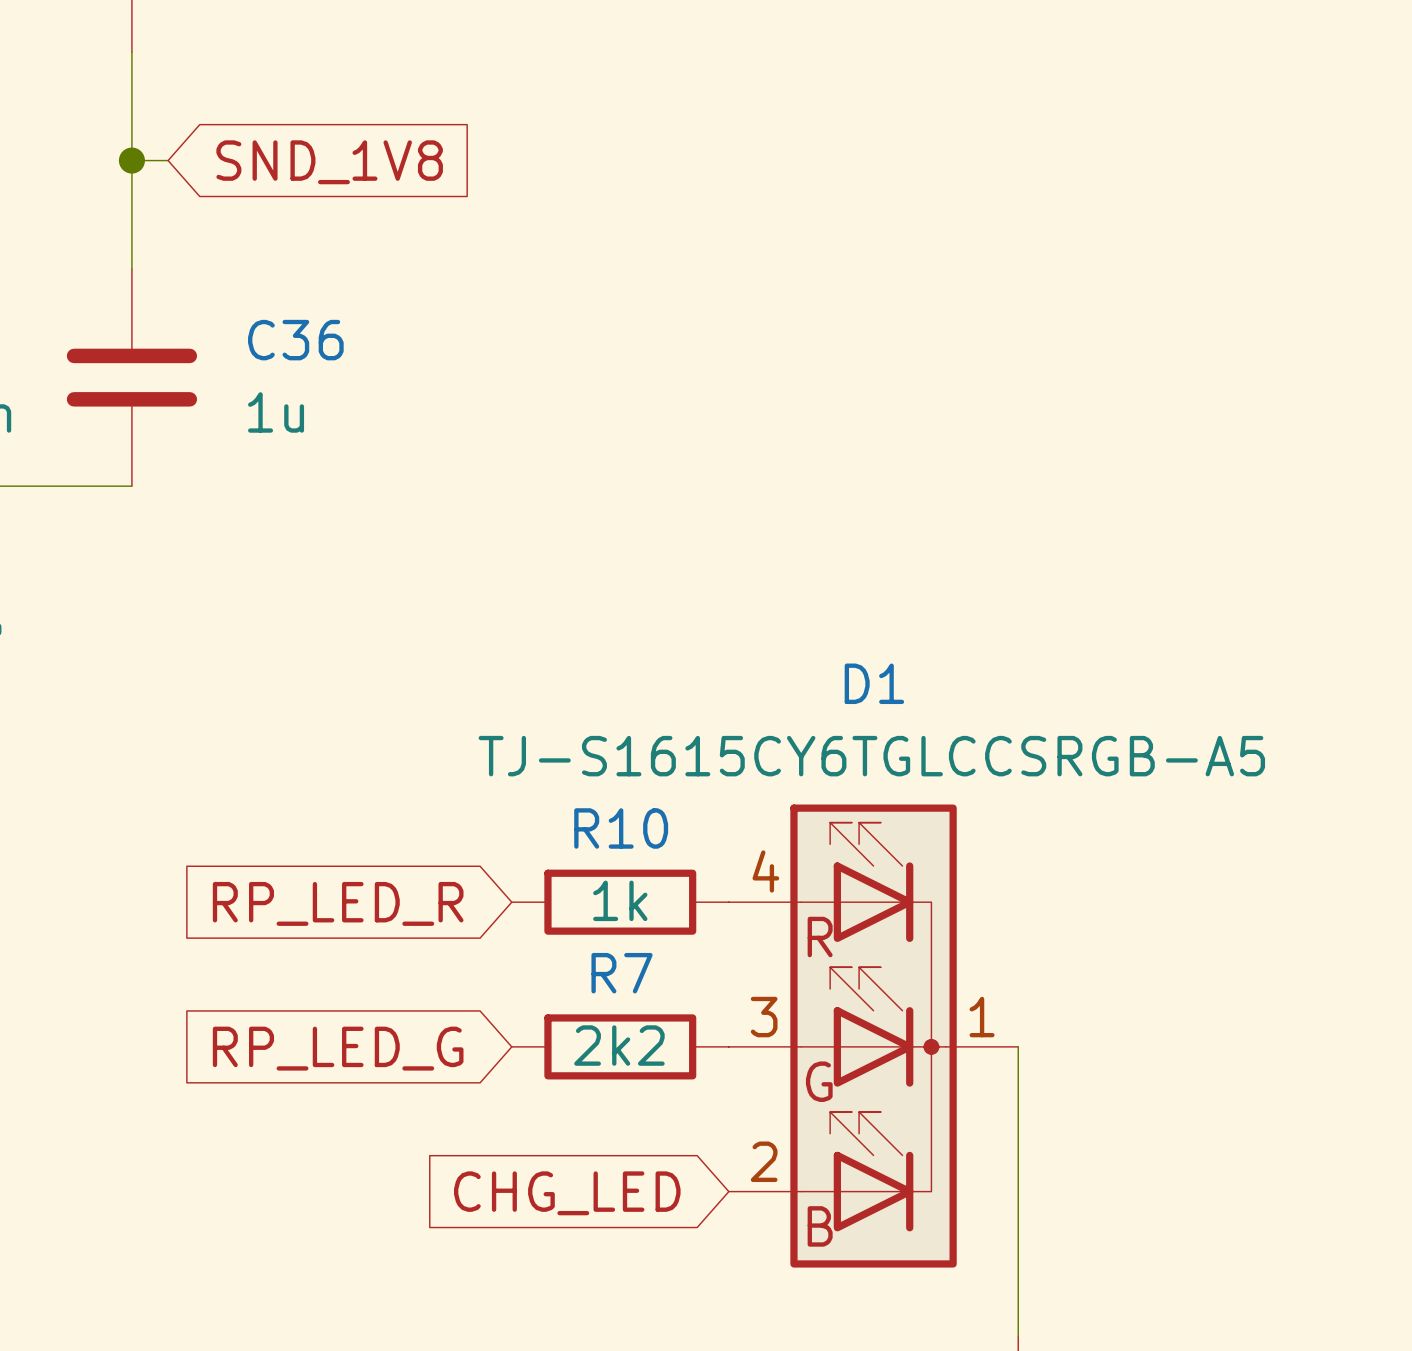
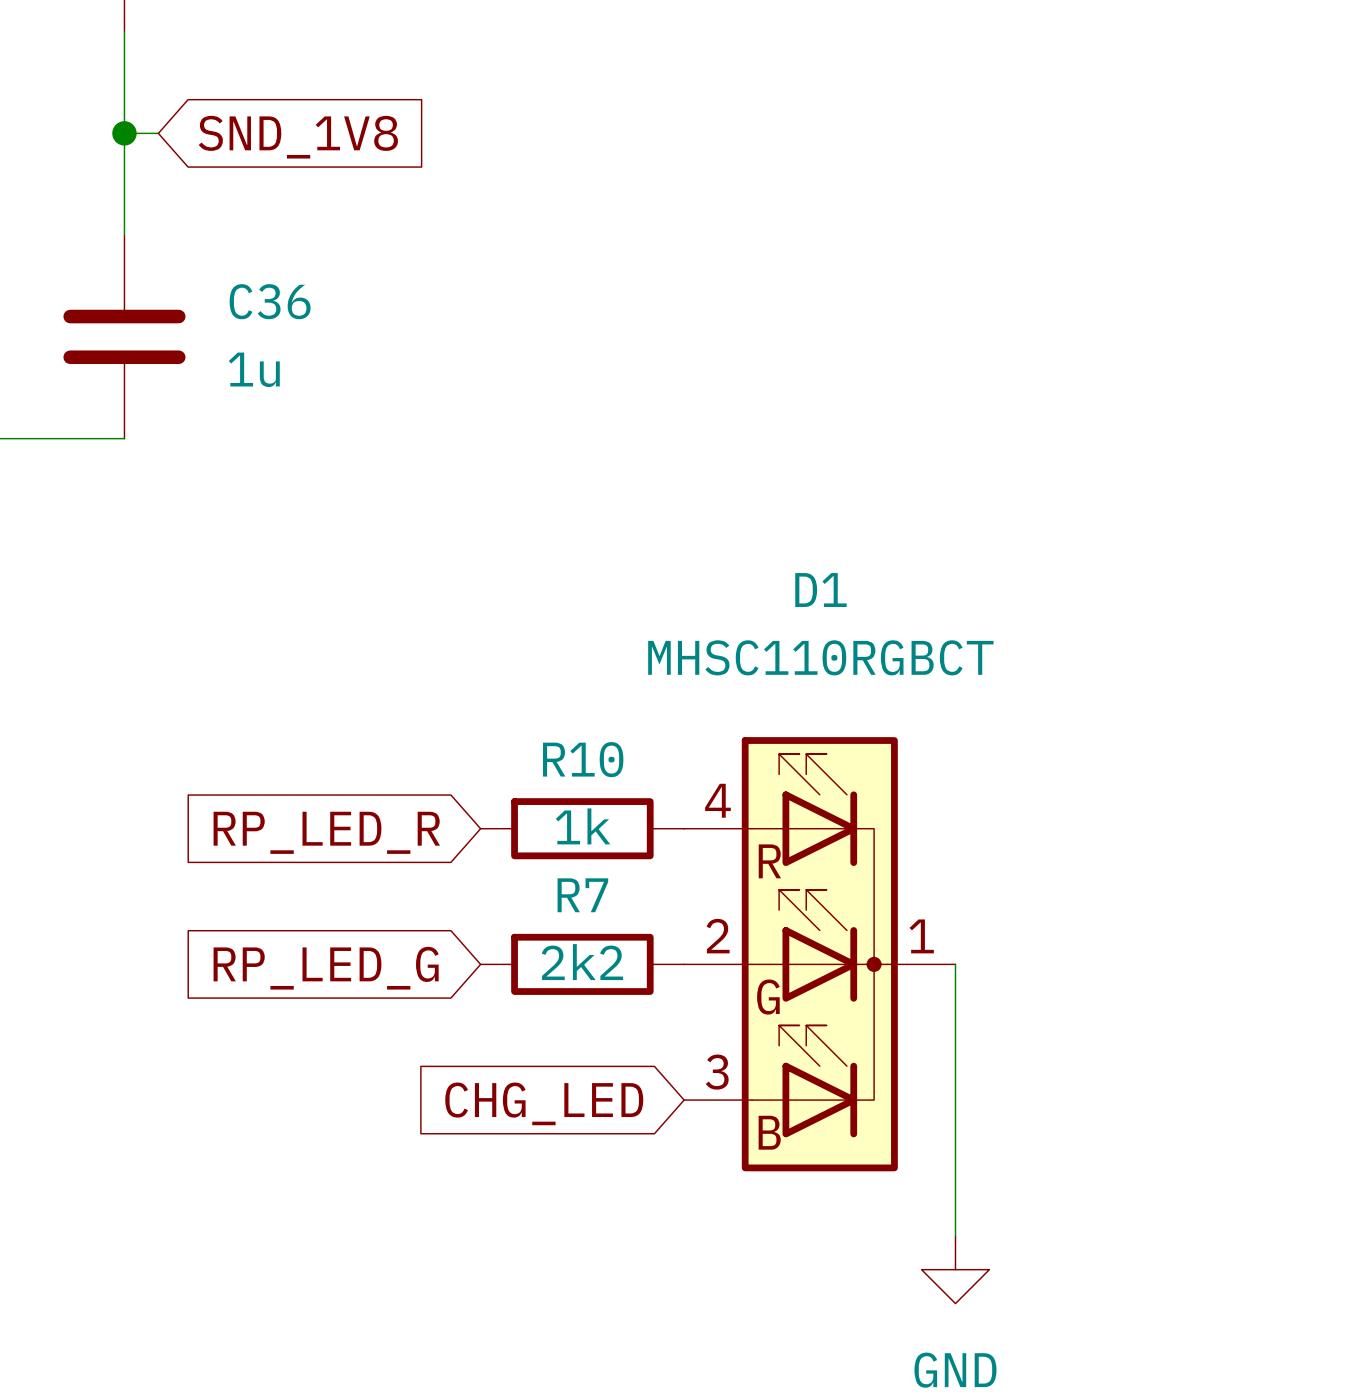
D1 name position: D1 (874, 683) -> D1 (820, 590)
D1 value: TJ-S1615CY6TGLCCSRGB-A5 (871, 756) -> MHSC110RGBCT (820, 657)
D1 pin number: 3 (764, 1017) -> 2 (718, 936)
D1 pin number: 2 (764, 1161) -> 3 (717, 1072)

